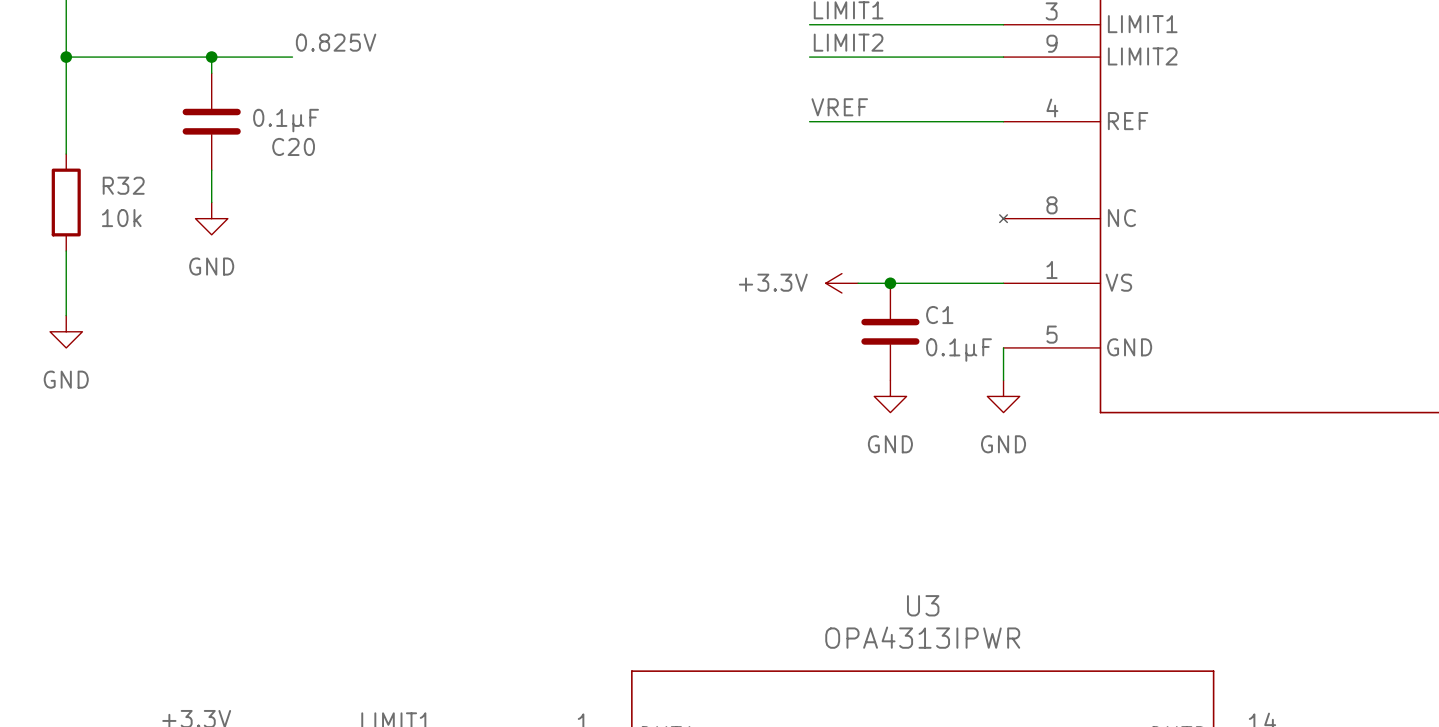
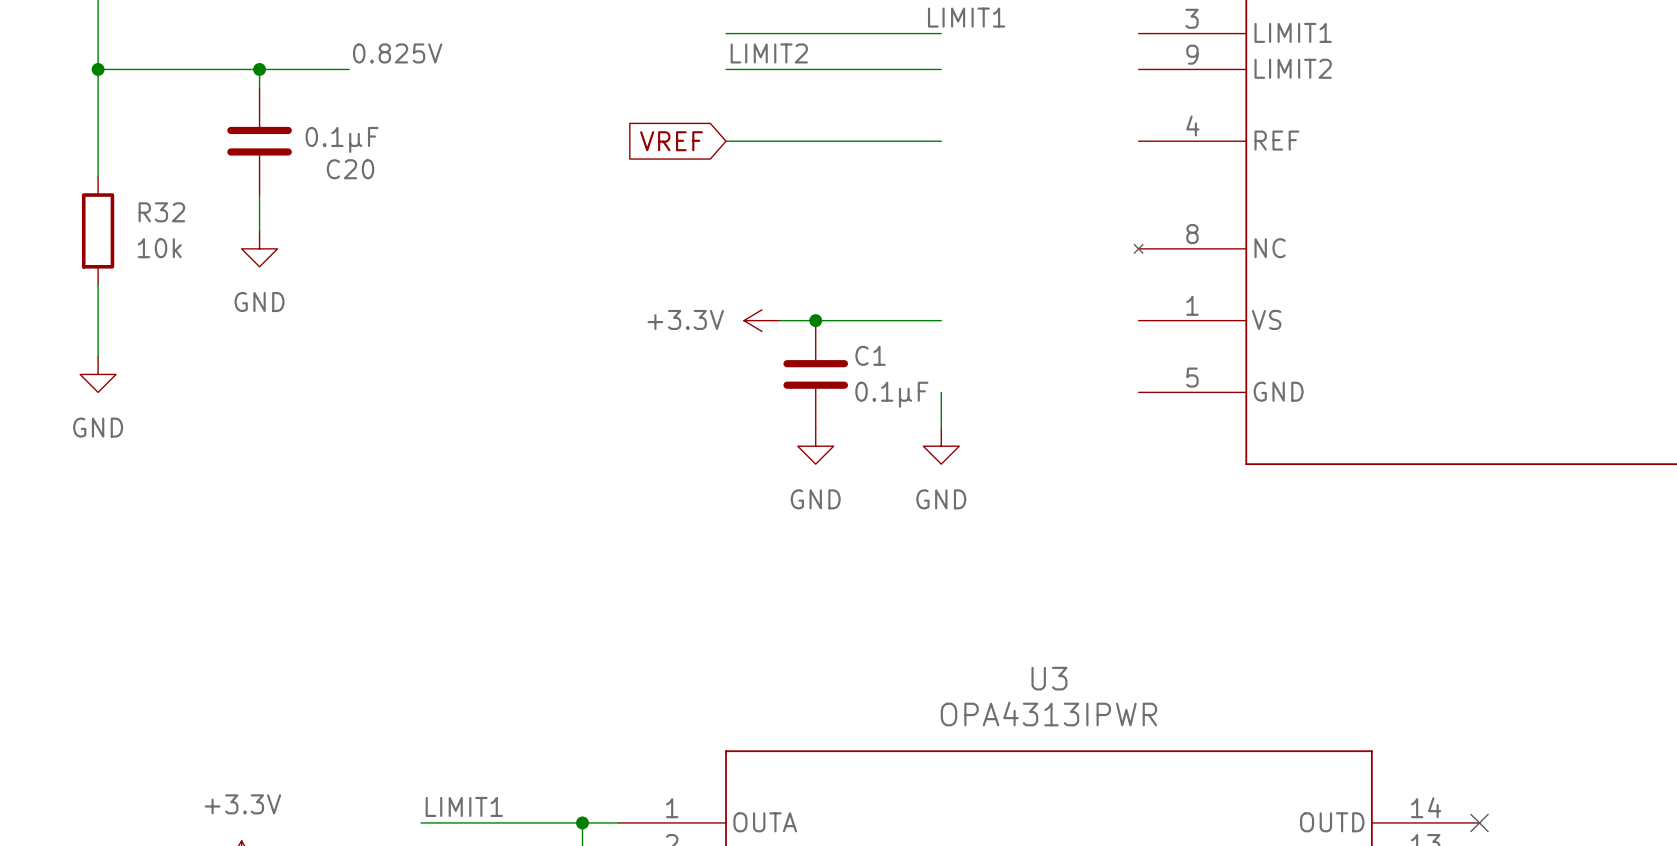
wire: (825, 24) (1003, 24) -> (726, 33) (923, 33)
label position: LIMIT2 (848, 42) -> LIMIT2 (769, 53)
wire: (825, 57) (1003, 57) -> (726, 69) (923, 69)
label: VREF (839, 107) -> none
global label: none -> VREF (671, 141)
wire: (825, 121) (1003, 121) -> (726, 141) (923, 141)
junction: none -> (815, 320)
power symbol position: +3.3V (841, 283) -> +3.3V (761, 320)
wire: (858, 283) (1003, 283) -> (779, 320) (941, 320)
junction: (890, 283) -> none
C1 position: (890, 331) -> (815, 374)
wire: (1003, 347) (1003, 380) -> (941, 392) (941, 428)
power symbol: none -> GND (815, 446)
power symbol position: GND (890, 396) -> GND (941, 446)
power symbol: GND (1003, 396) -> none

